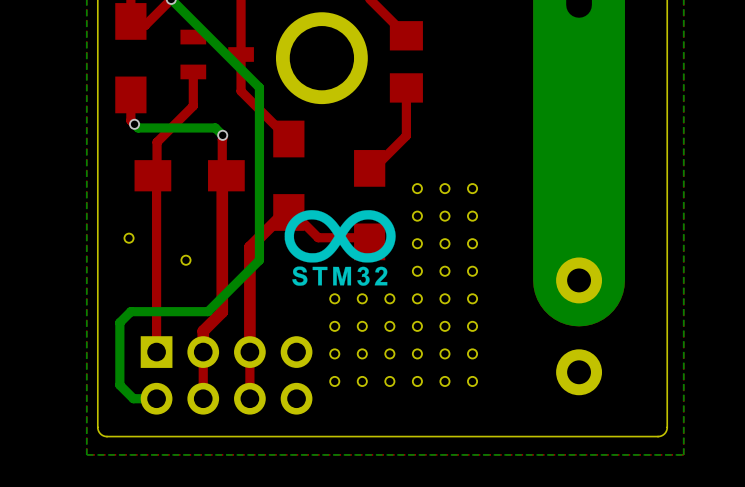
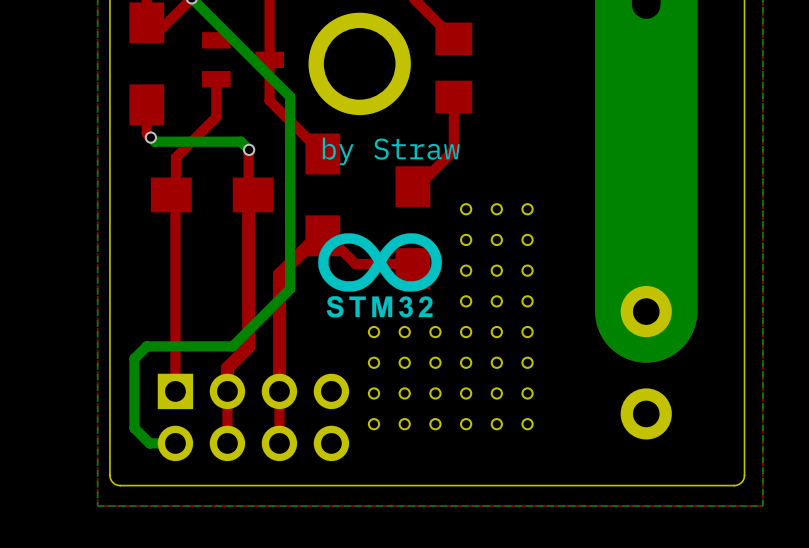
text: none -> by Straw (391, 151)
part: (129, 238) -> none
part: (185, 260) -> none

